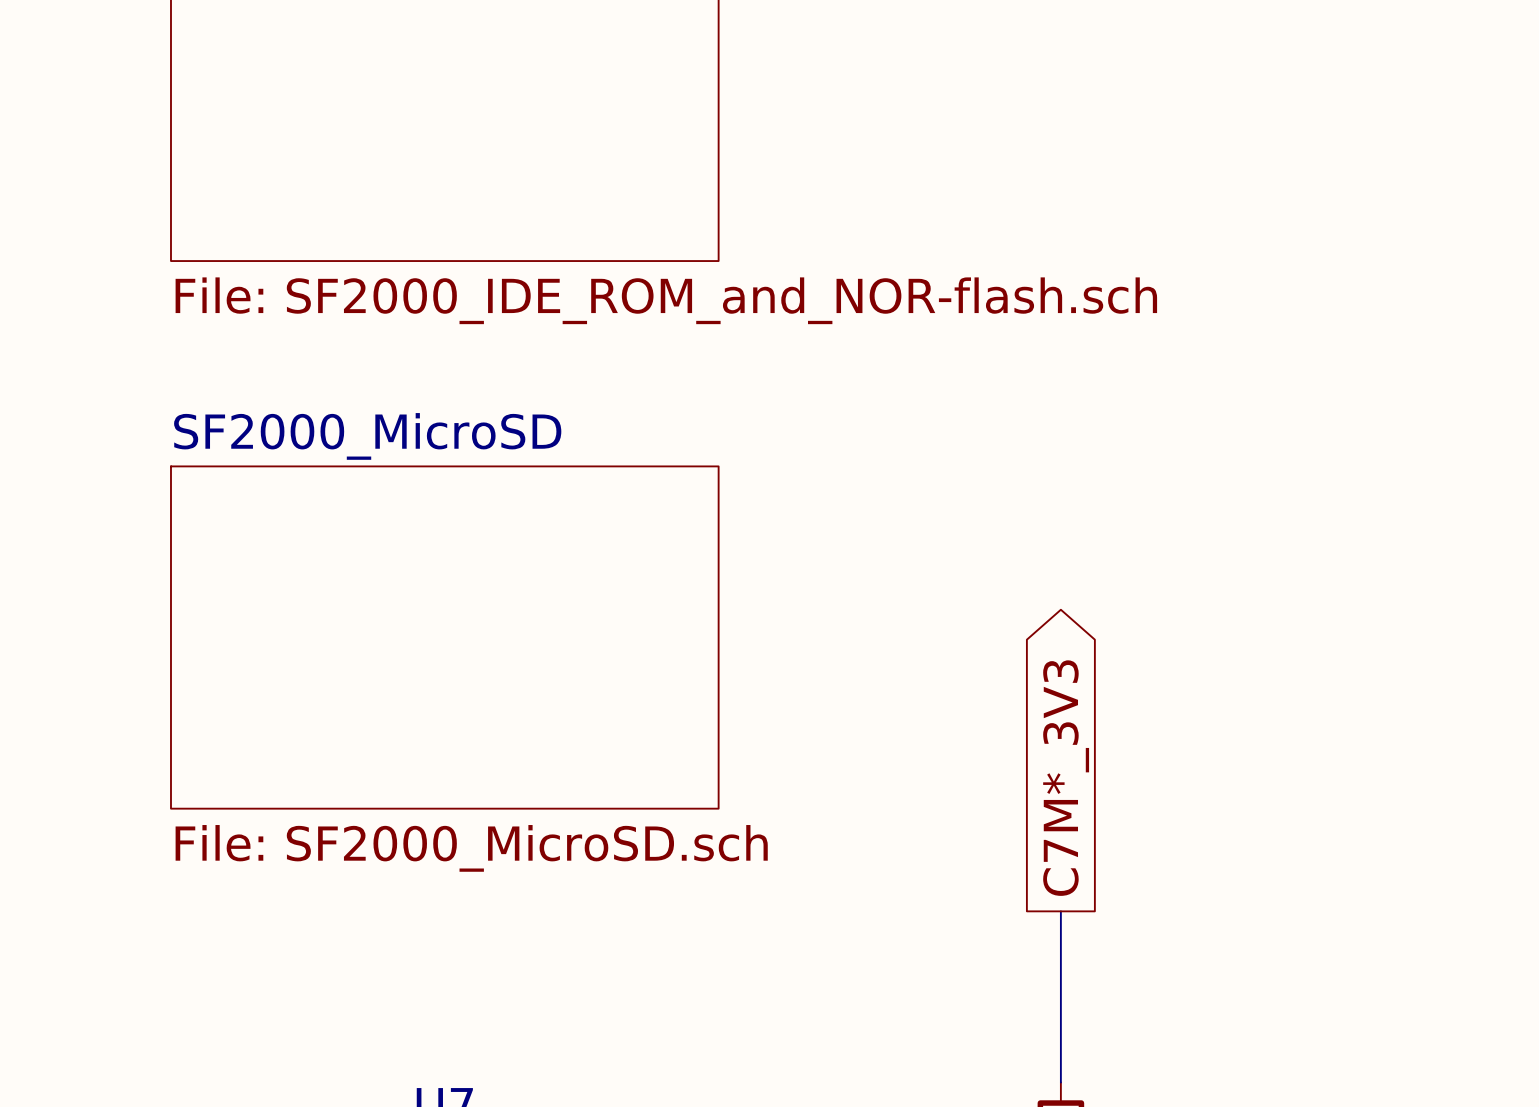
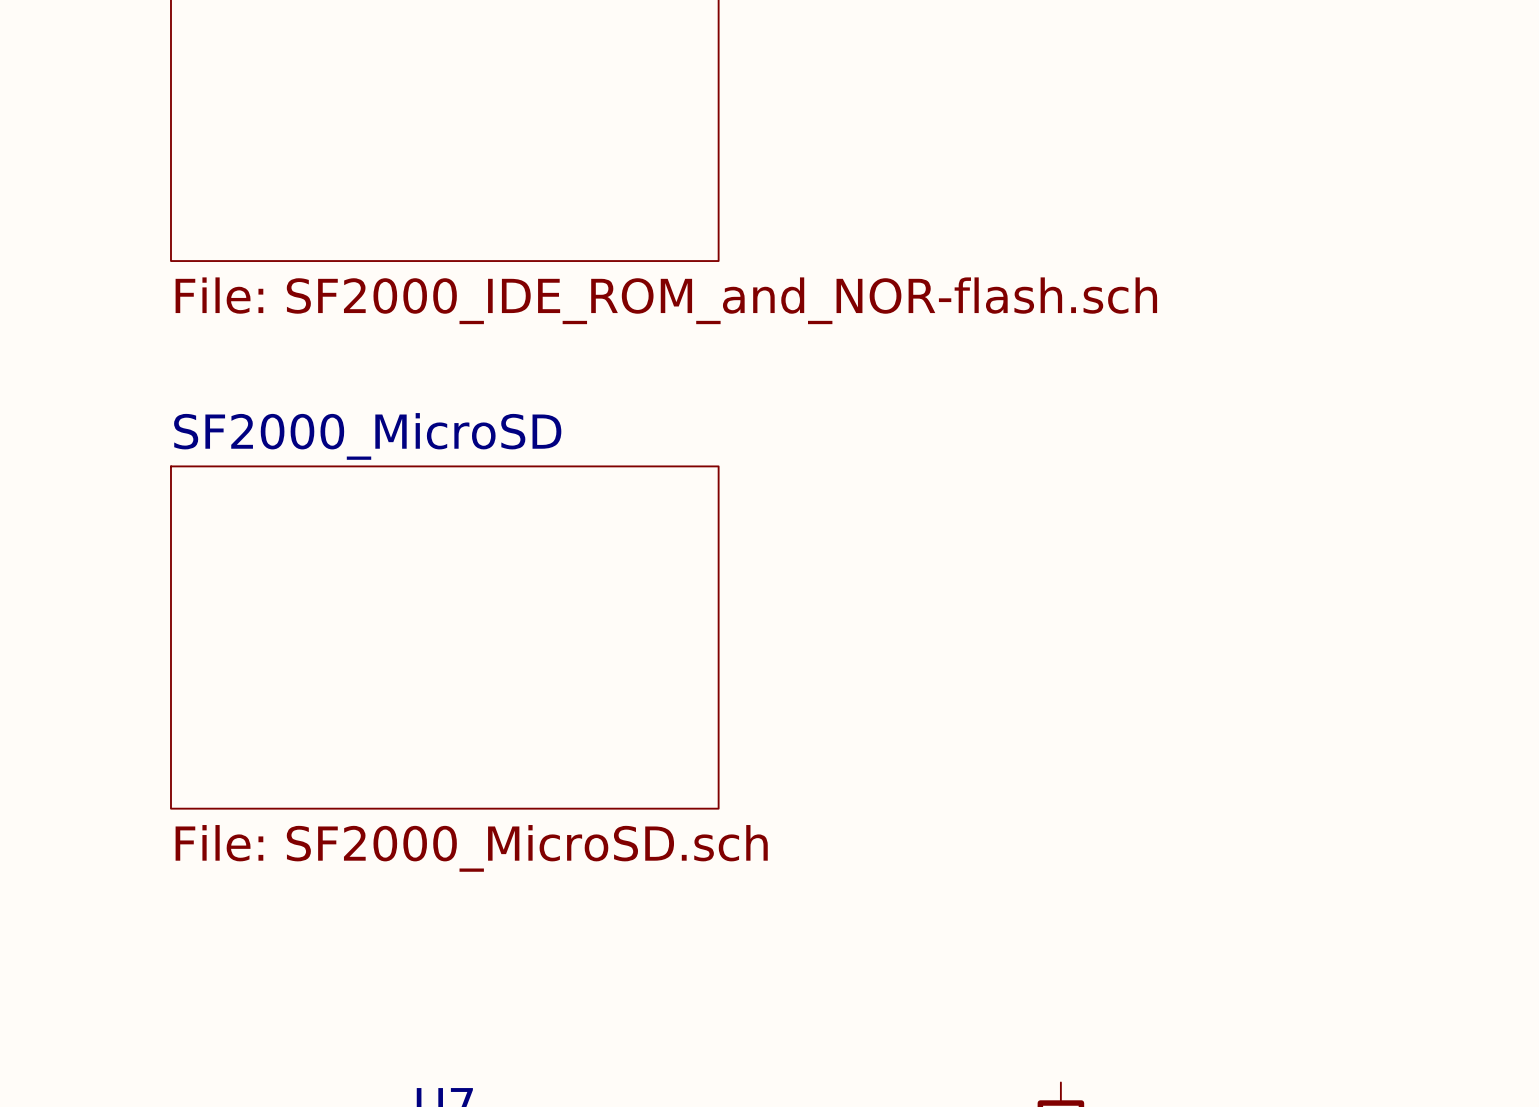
global label: C7M*_3V3 (1066, 778) -> none
wire: (1060, 911) (1060, 1082) -> none

